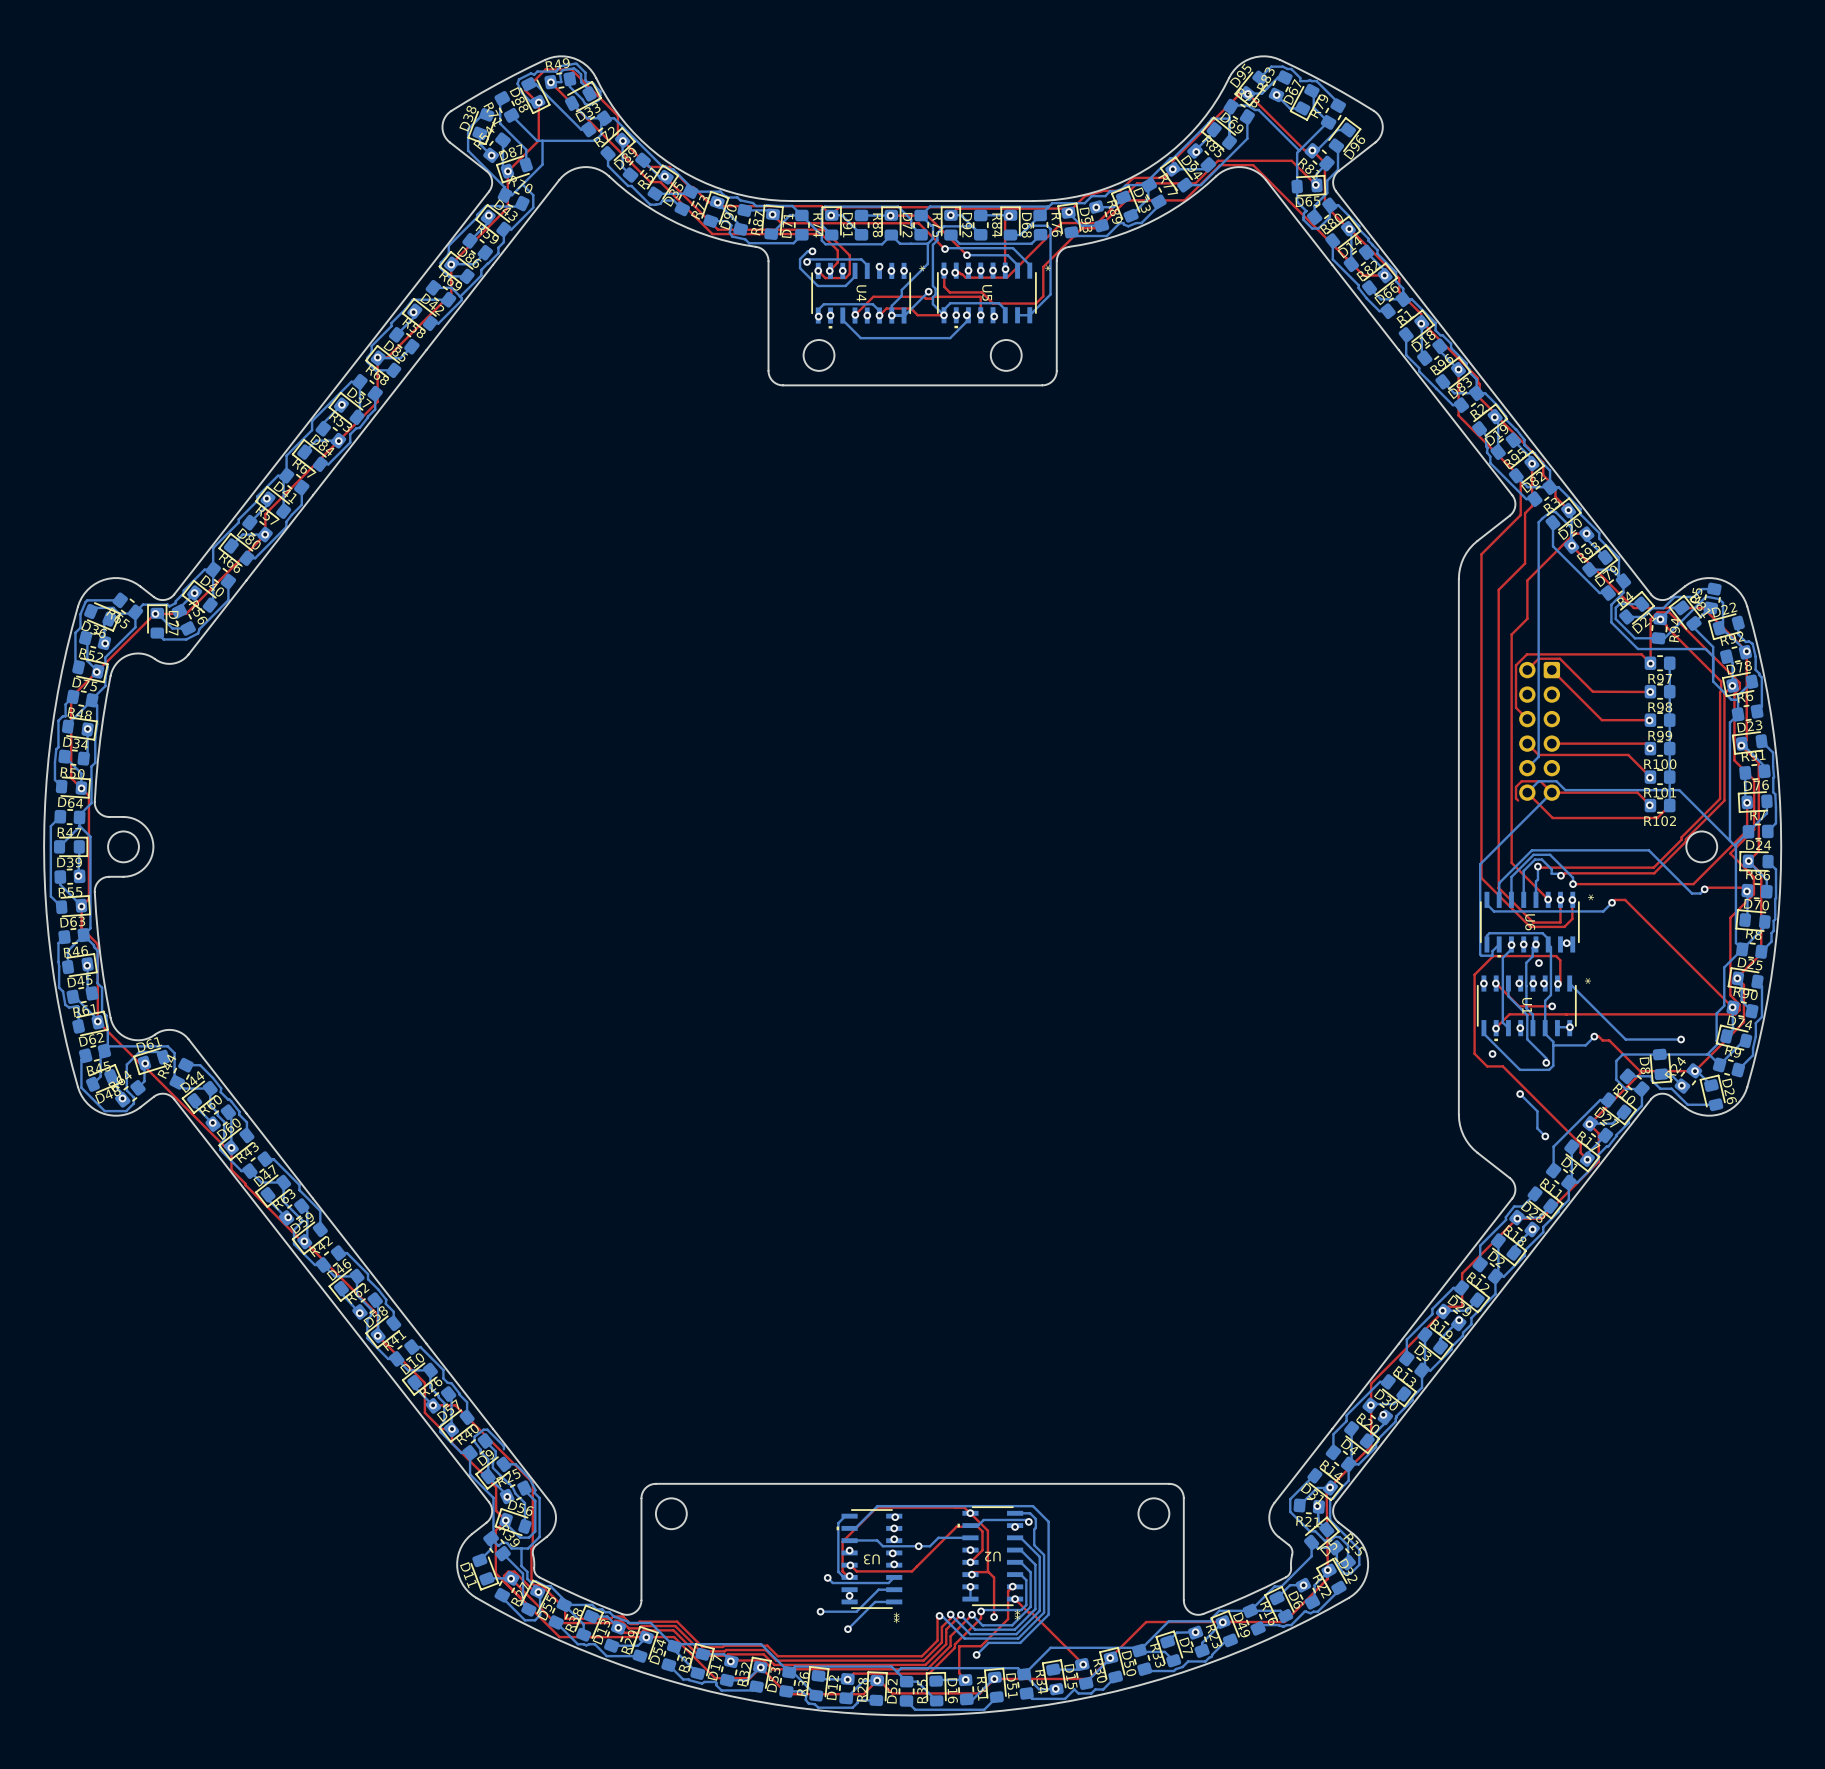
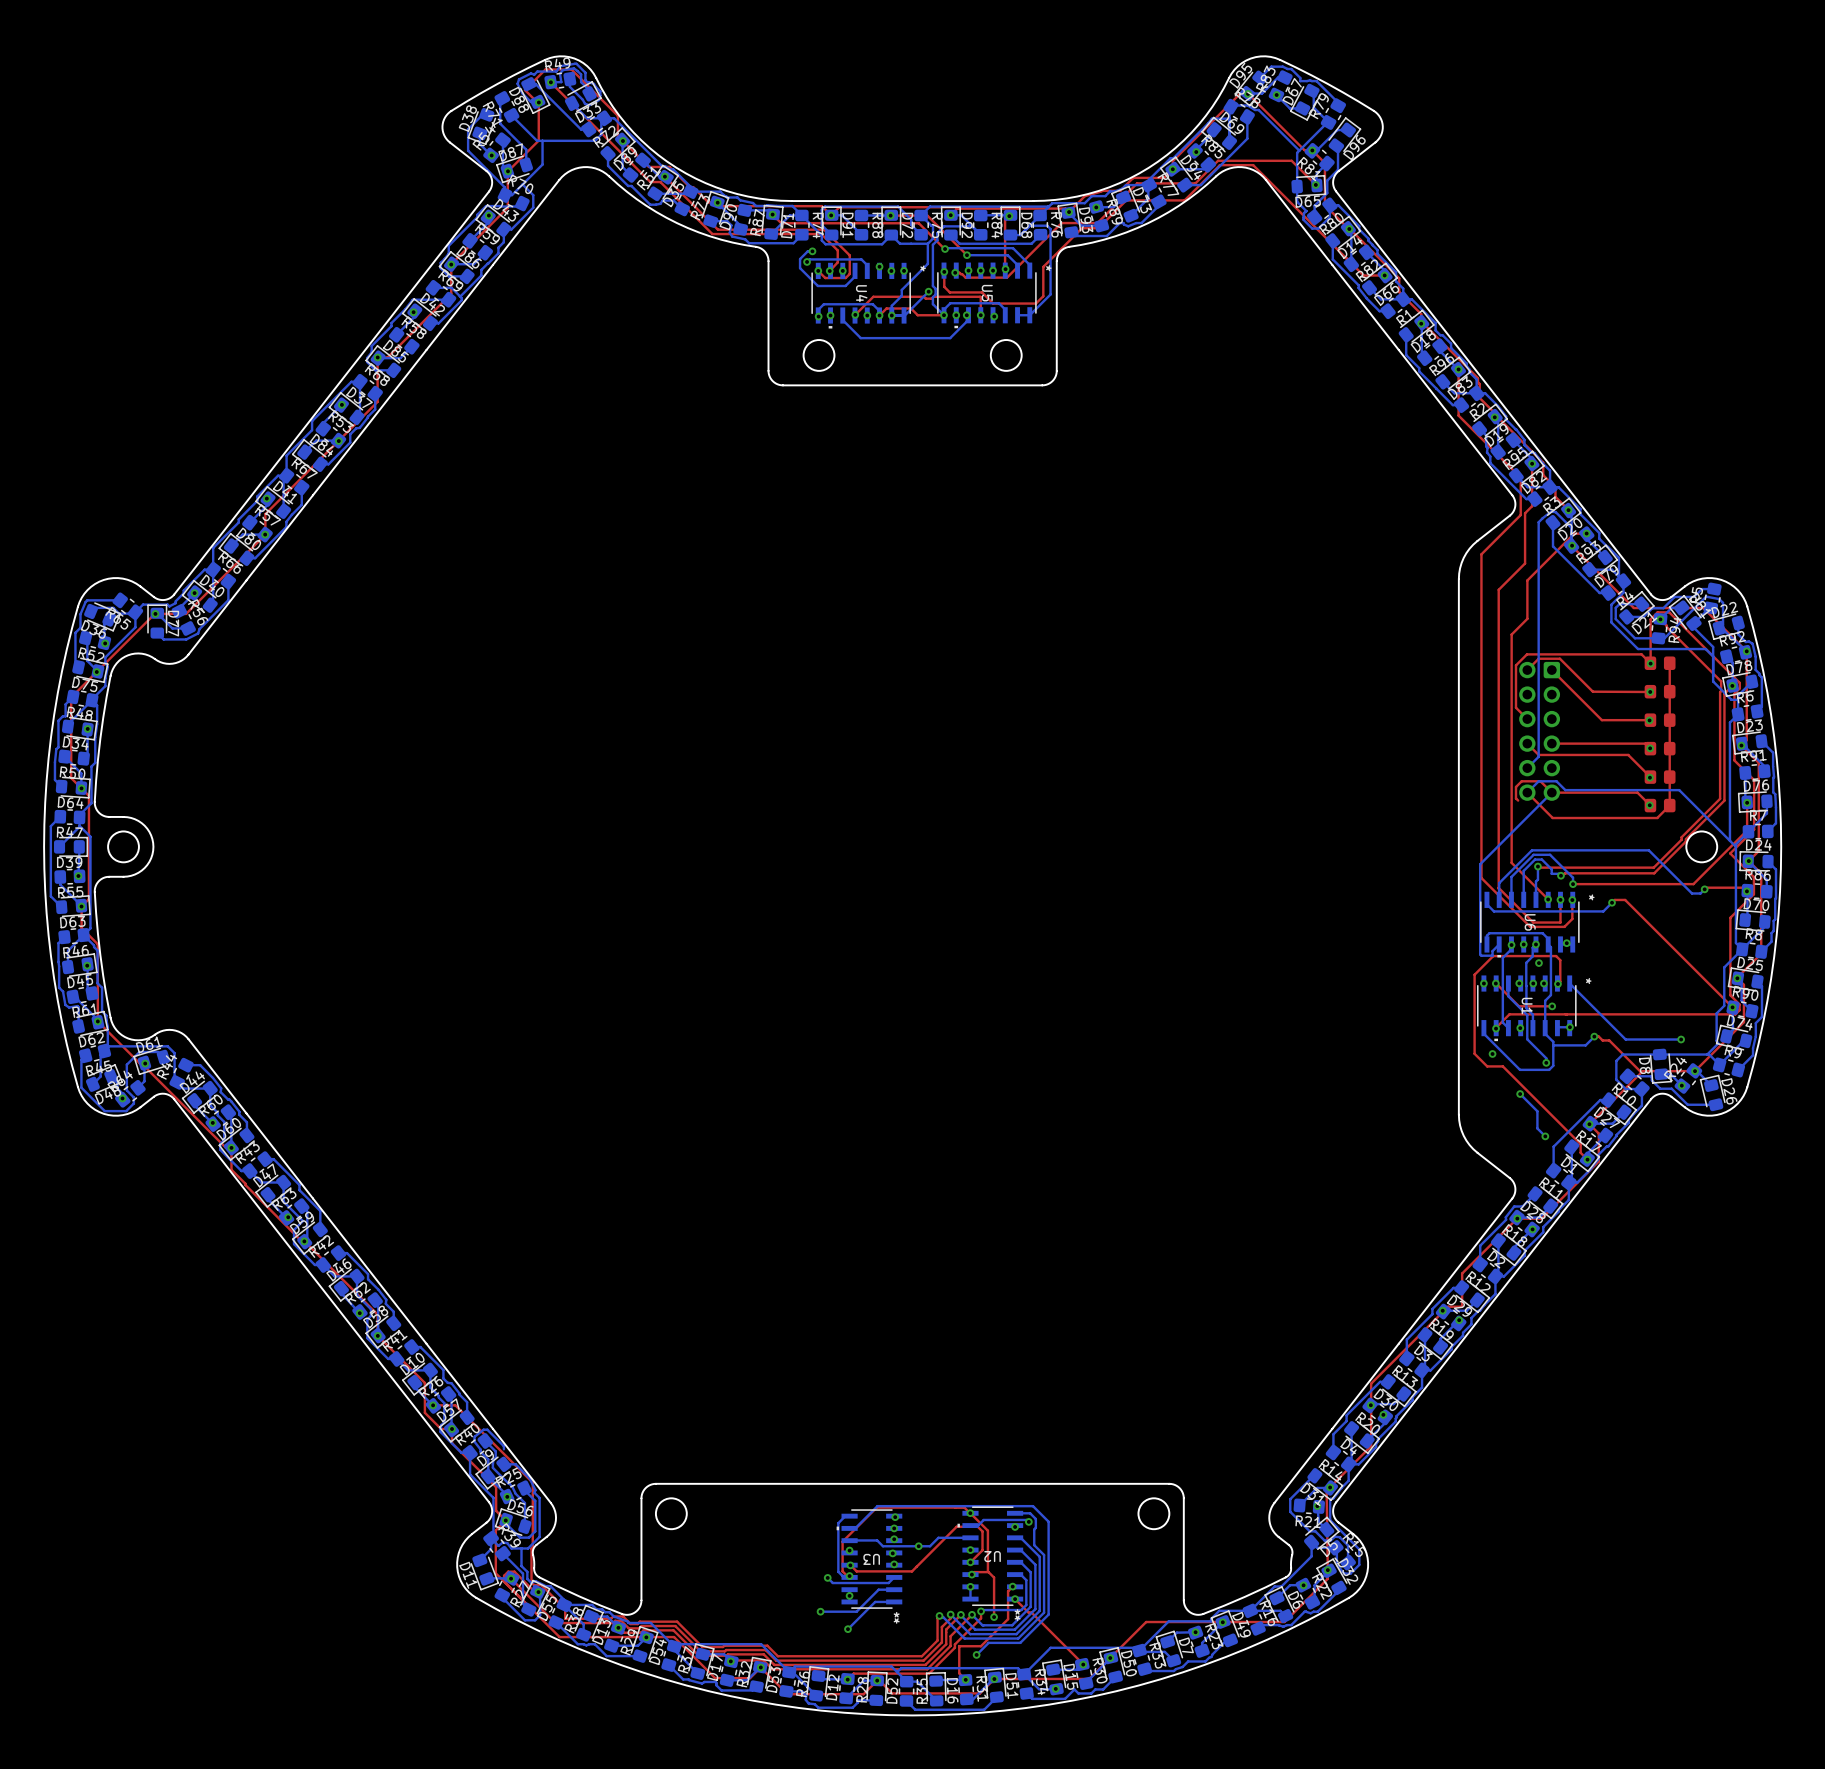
R97 side: bottom (1660, 663) -> top (1660, 663)
top track: none -> (1669, 663) (1669, 805)
bottom track: (1669, 663) (1669, 805) -> none
R98 side: bottom (1660, 691) -> top (1660, 691)
R99 side: bottom (1660, 720) -> top (1660, 720)
R100 side: bottom (1660, 748) -> top (1660, 748)
R101 side: bottom (1660, 777) -> top (1660, 777)
R102 side: bottom (1660, 805) -> top (1660, 805)

